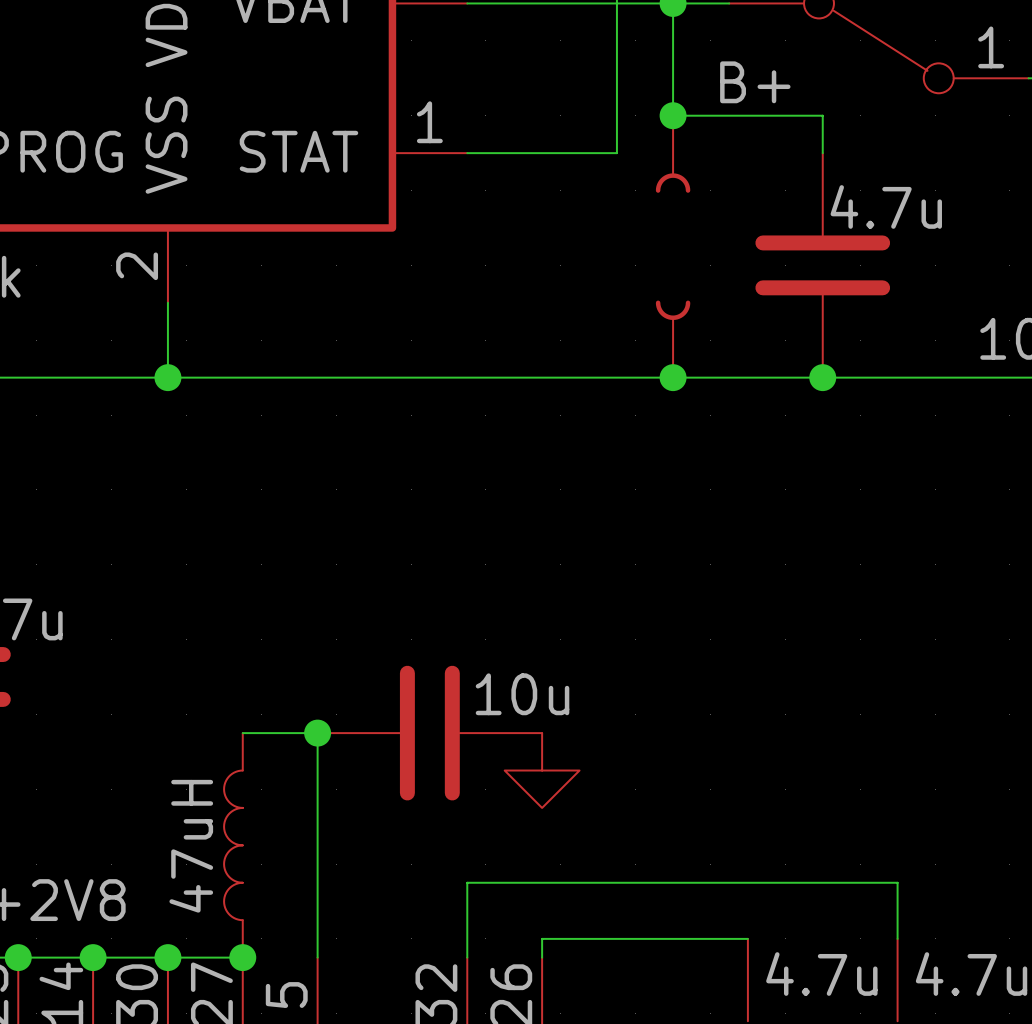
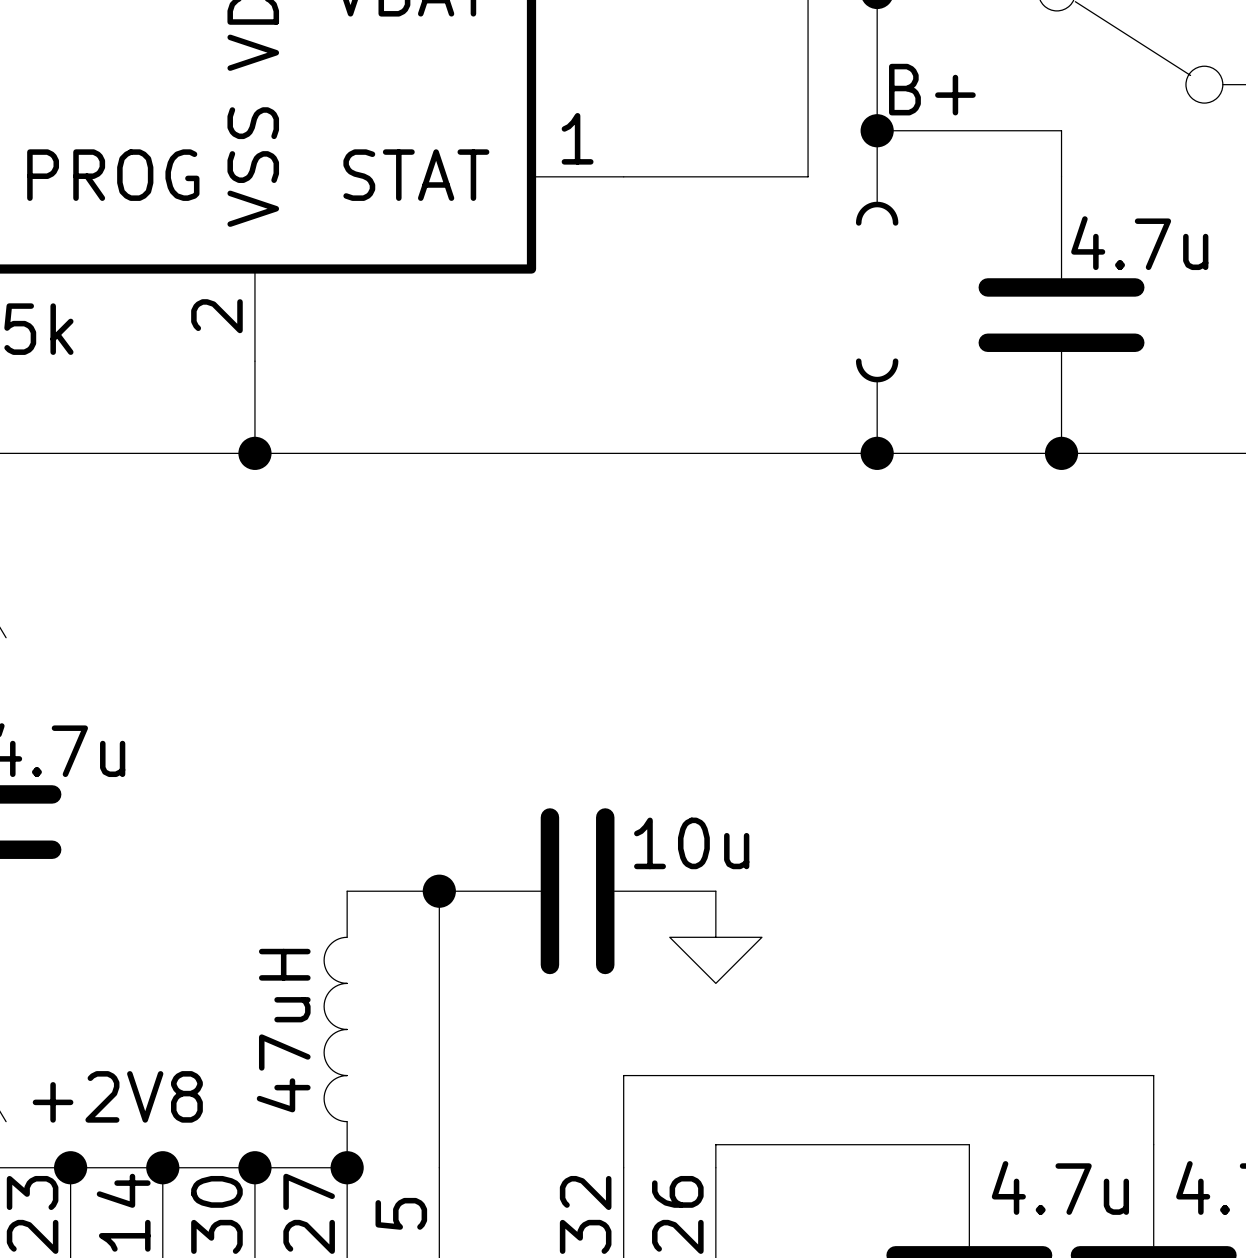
label position: B+ (755, 82) -> B+ (932, 89)

